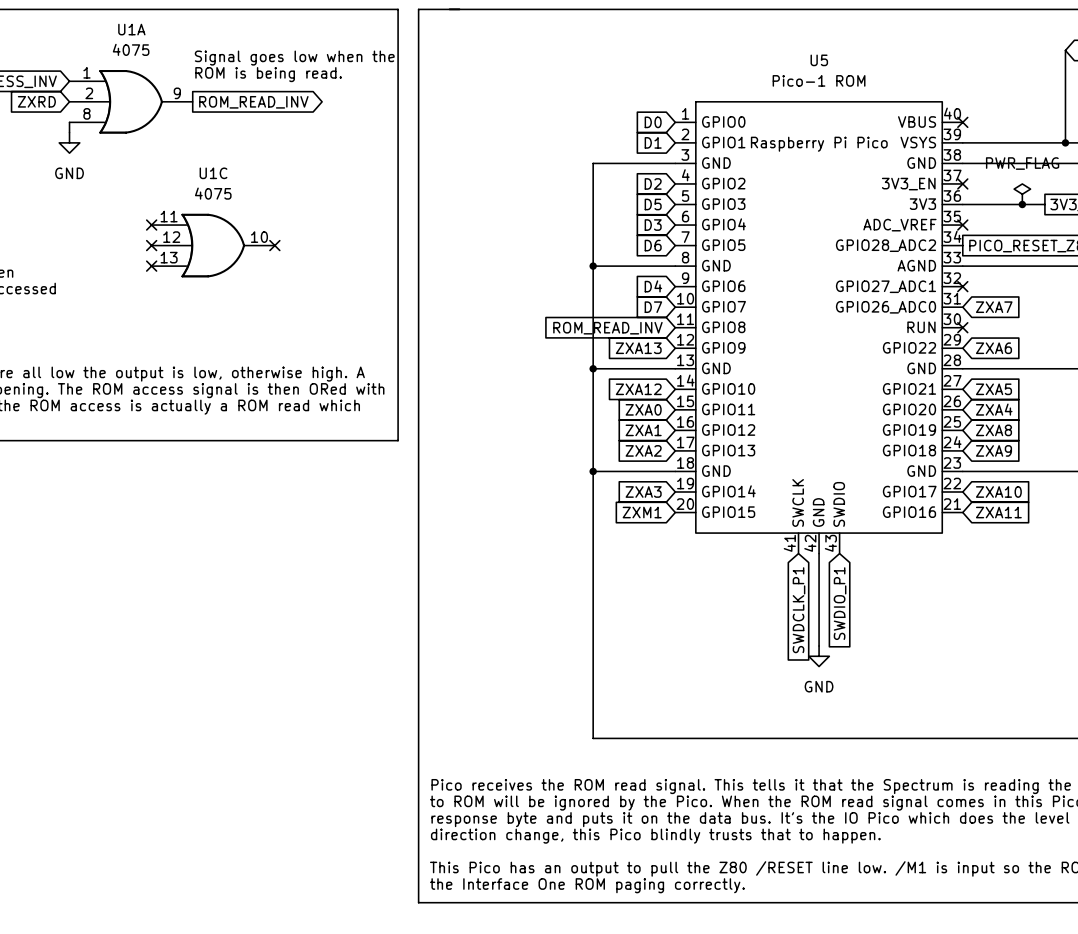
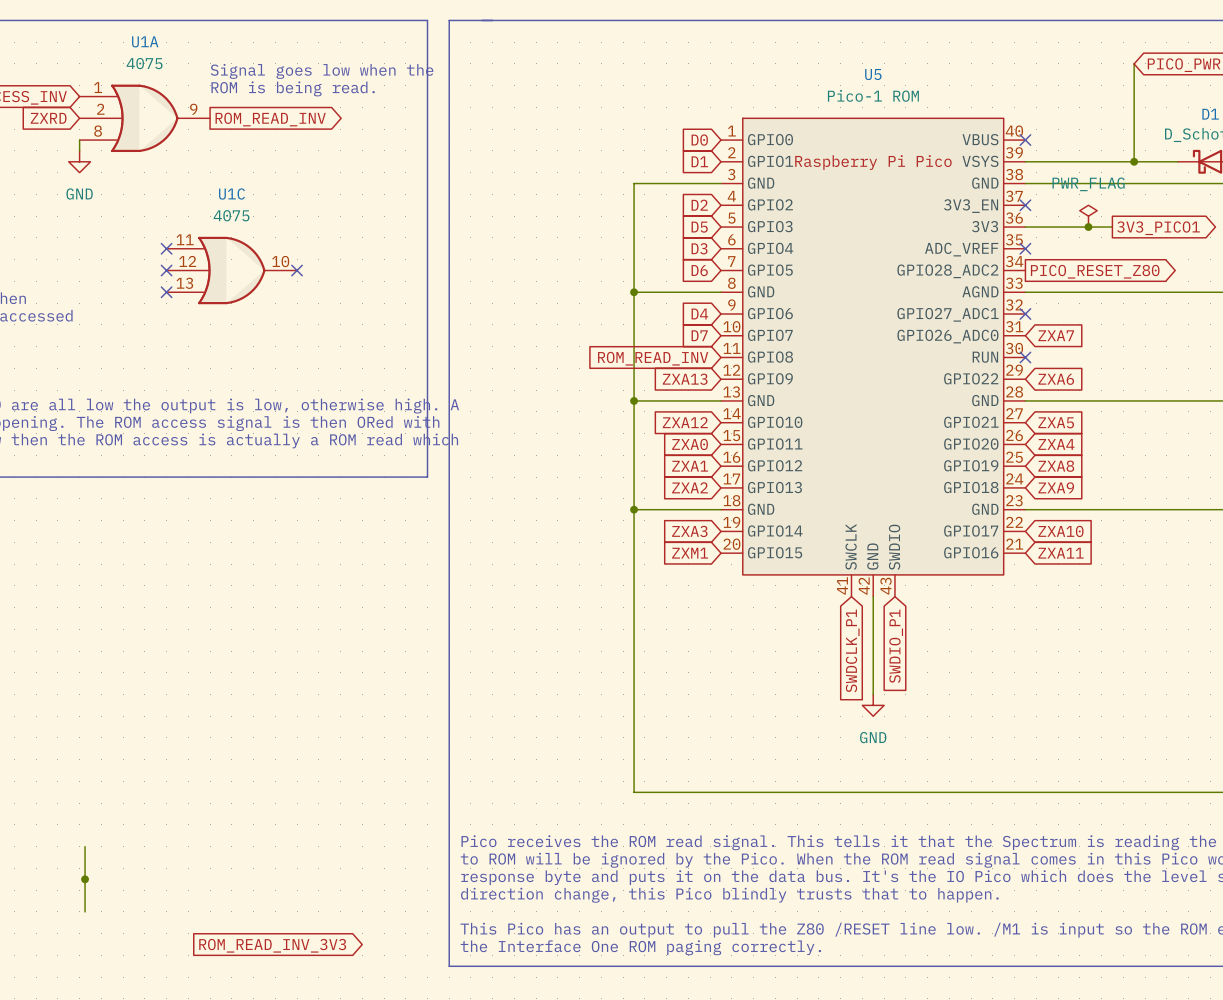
wire: none -> (85, 846) (85, 911)
junction: none -> (85, 879)
global label: none -> ROM_READ_INV_3V3 (272, 945)

